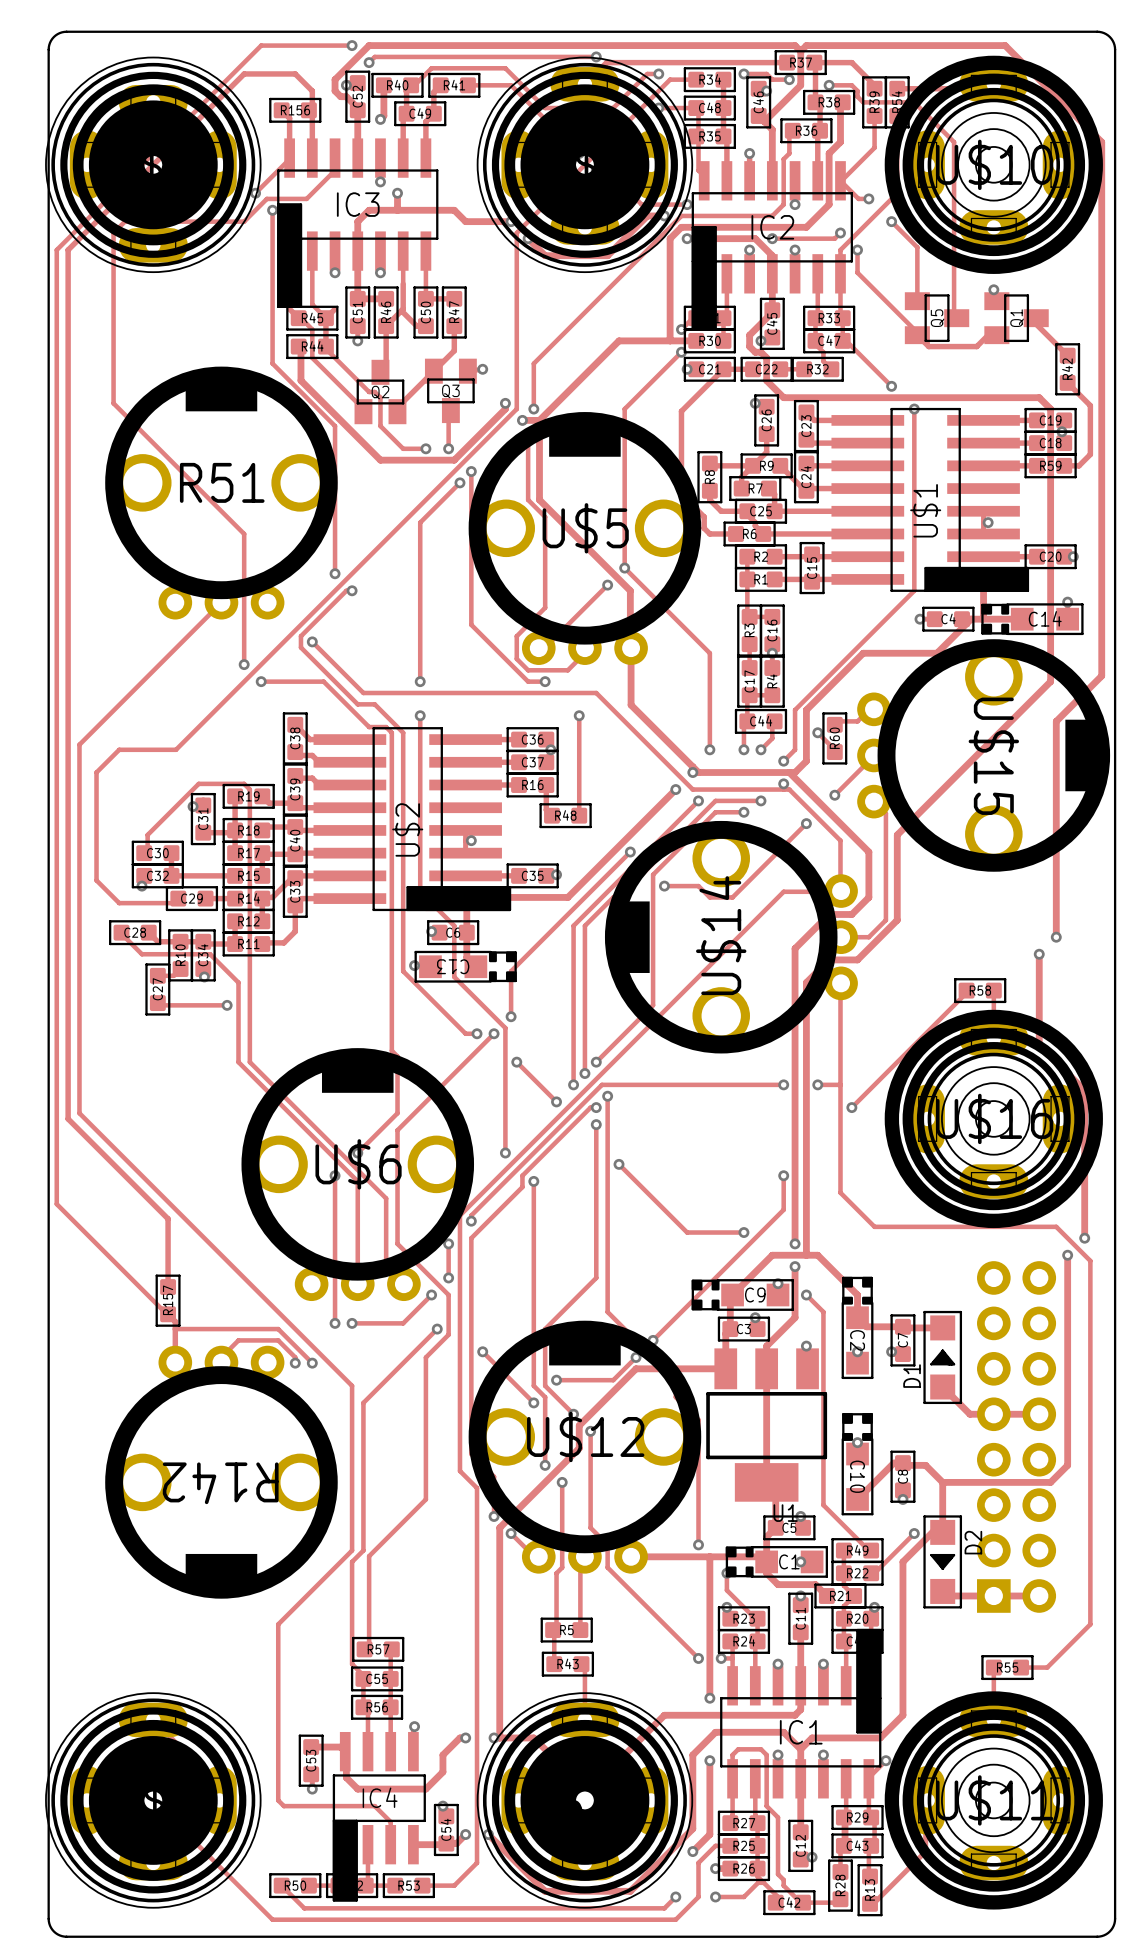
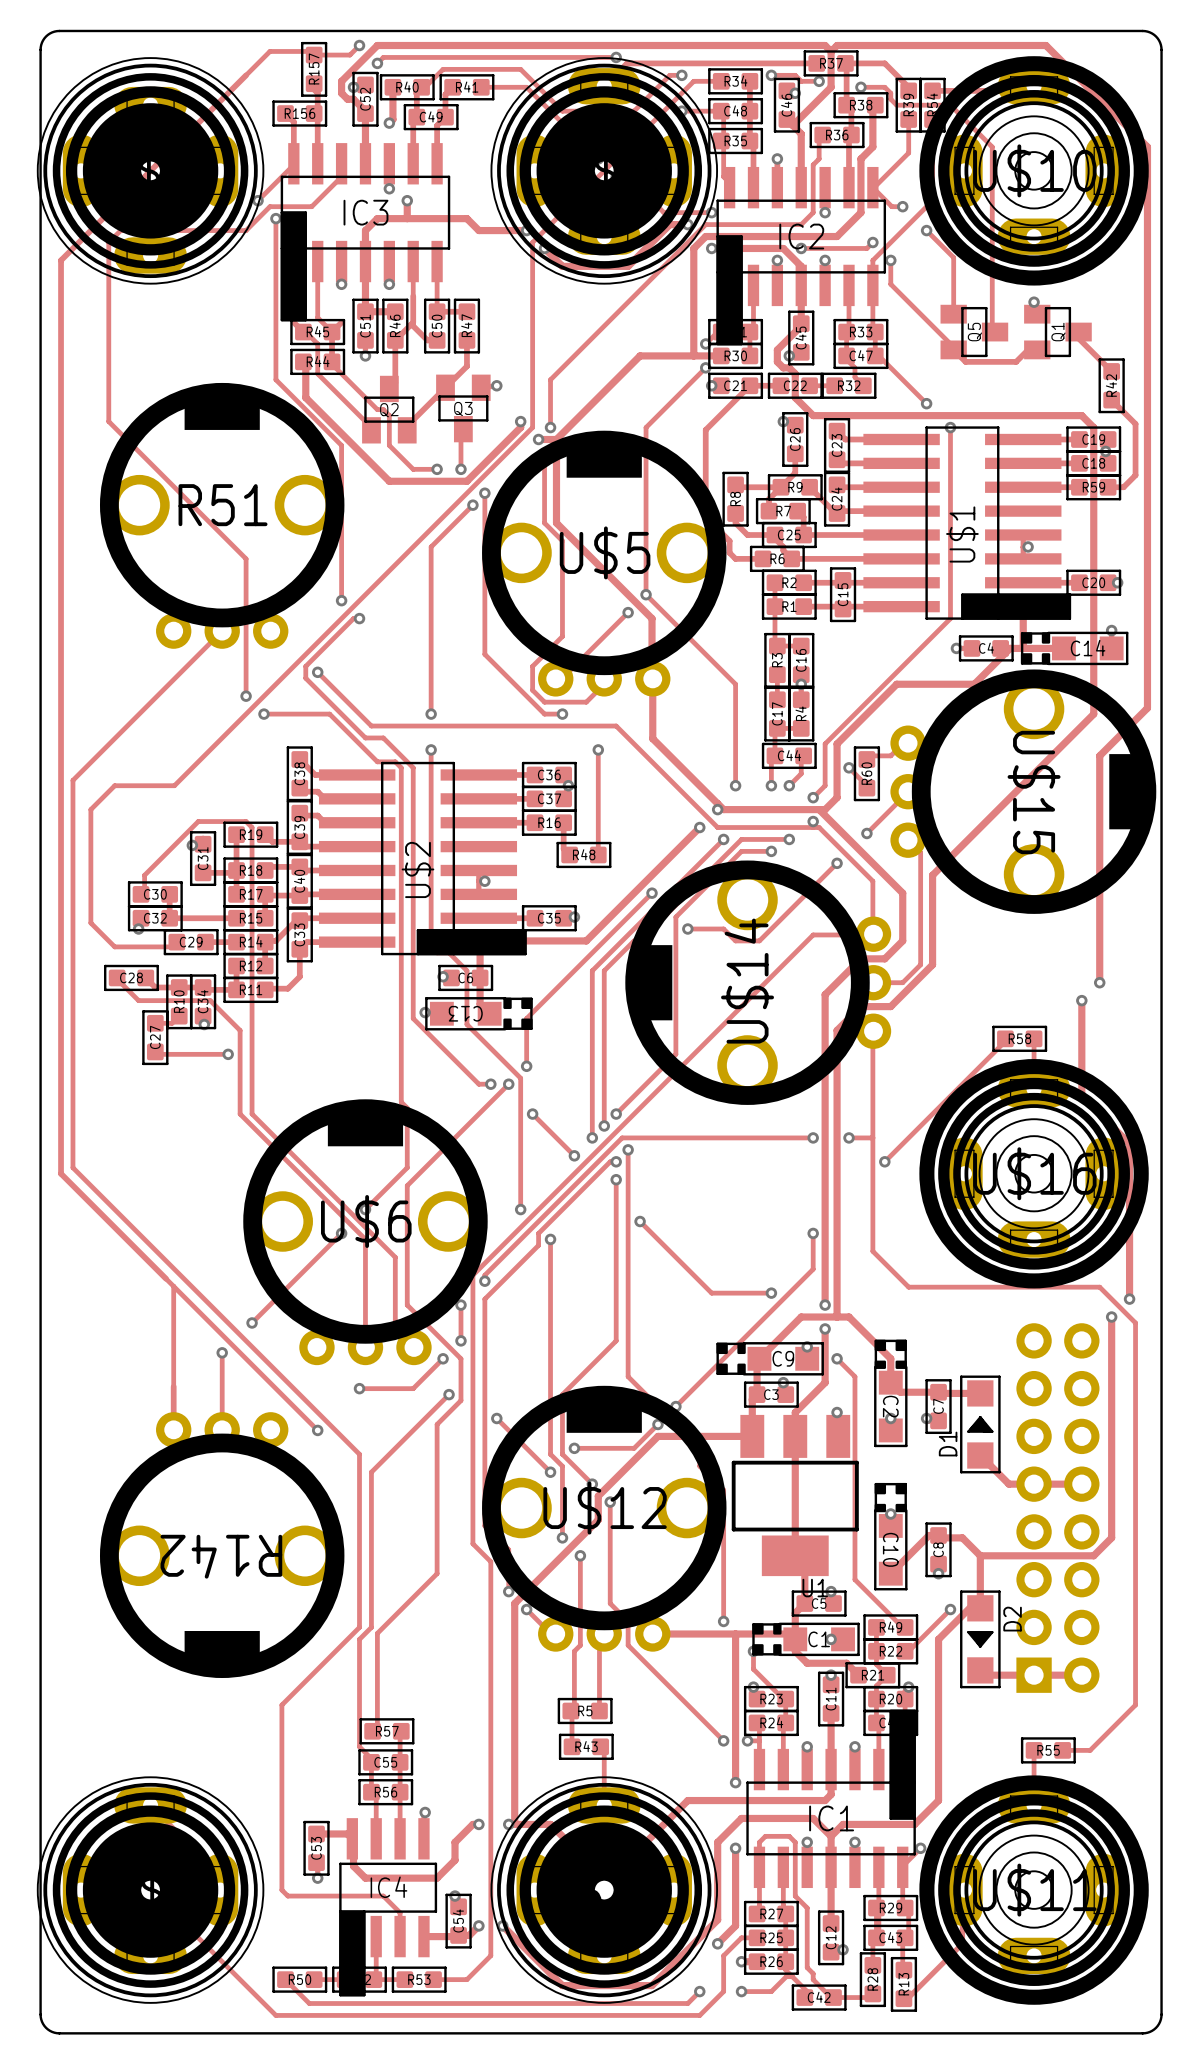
track: (352, 45) (261, 45) (56, 250) (56, 1204) (175, 1321) -> (173, 1286) (173, 1386)
track: (244, 73) (295, 73) (308, 87) -> (246, 75) (269, 51) (310, 51) (314, 55) (349, 55) (359, 45)
track: (335, 1175) (335, 1323) -> (341, 1233) (252, 1322)
track: (168, 1218) (168, 1287) -> none
via: none -> (252, 1322)
via: none -> (222, 1352)
R157 position: (168, 1300) -> (314, 69)
via: (335, 1323) -> none
track: (175, 1329) (278, 1329) -> (166, 1278) (281, 1394)
track: (221, 1357) (238, 1340) (278, 1340) (295, 1357) (295, 1363) -> (222, 1424) (222, 1352)
via: (295, 1363) -> none

